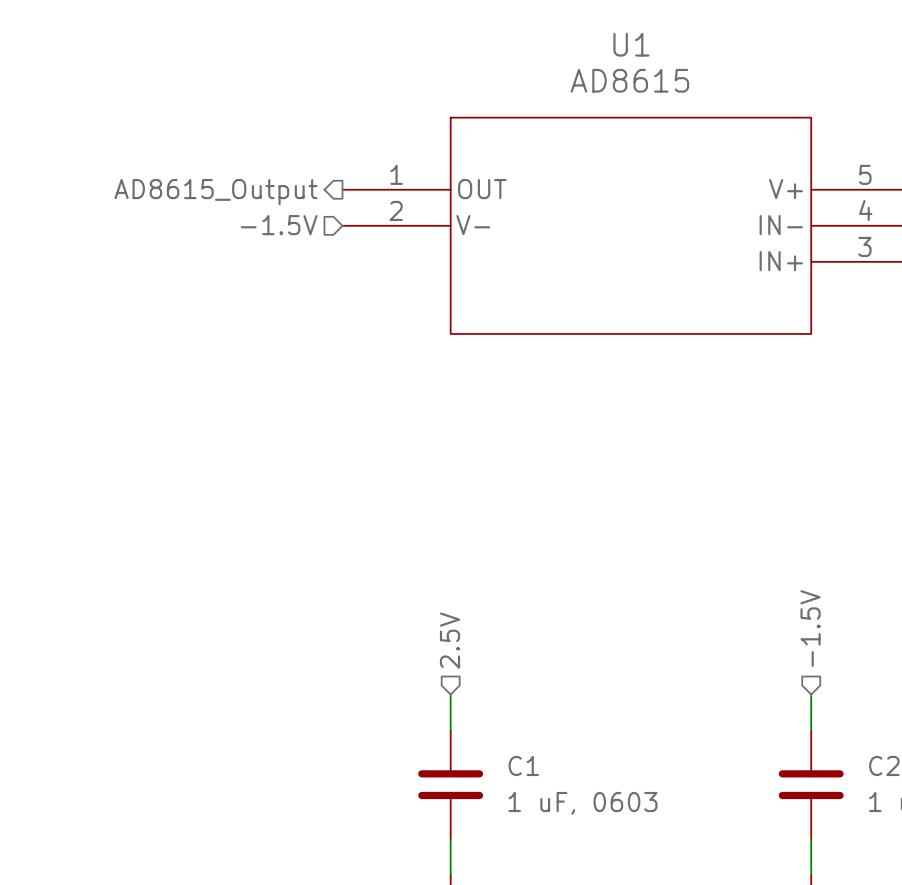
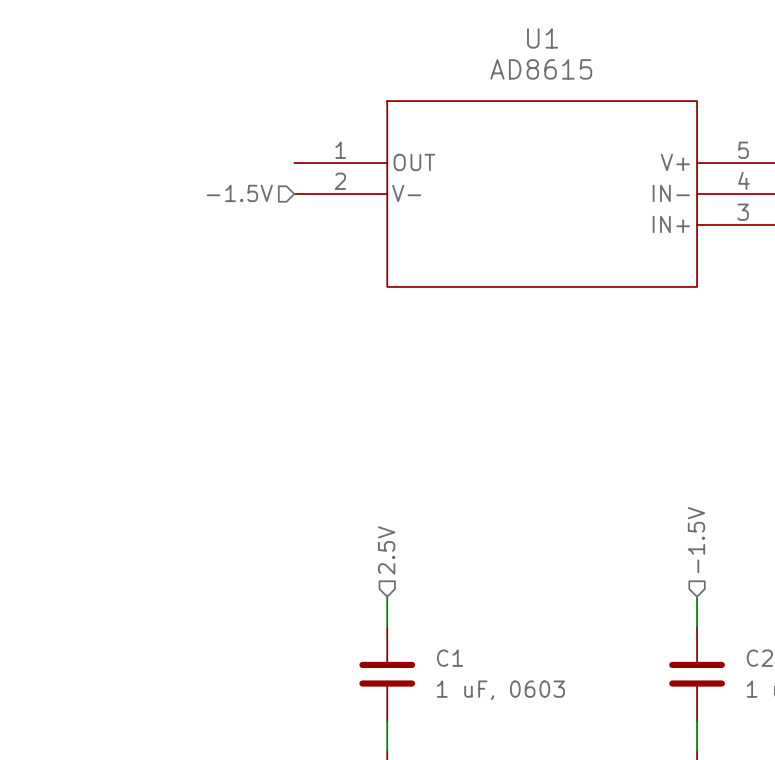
hierarchical label: AD8615_Output (216, 192) -> none

